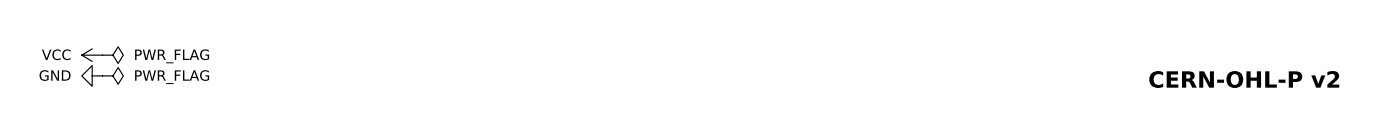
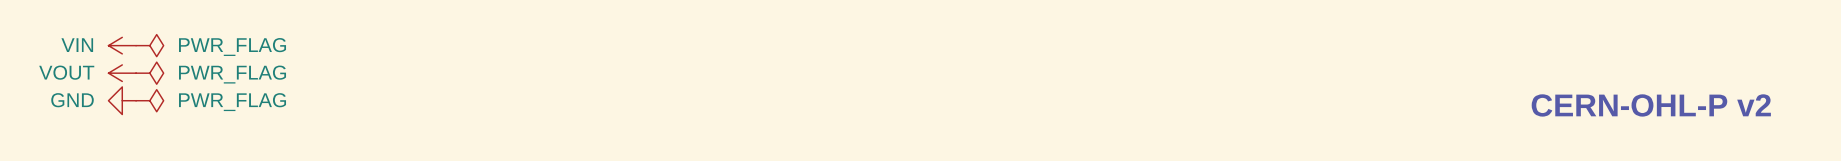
power symbol: none -> VIN (122, 45)
power symbol: none -> PWR_FLAG (149, 45)
power symbol: VCC (92, 55) -> VOUT (122, 73)

